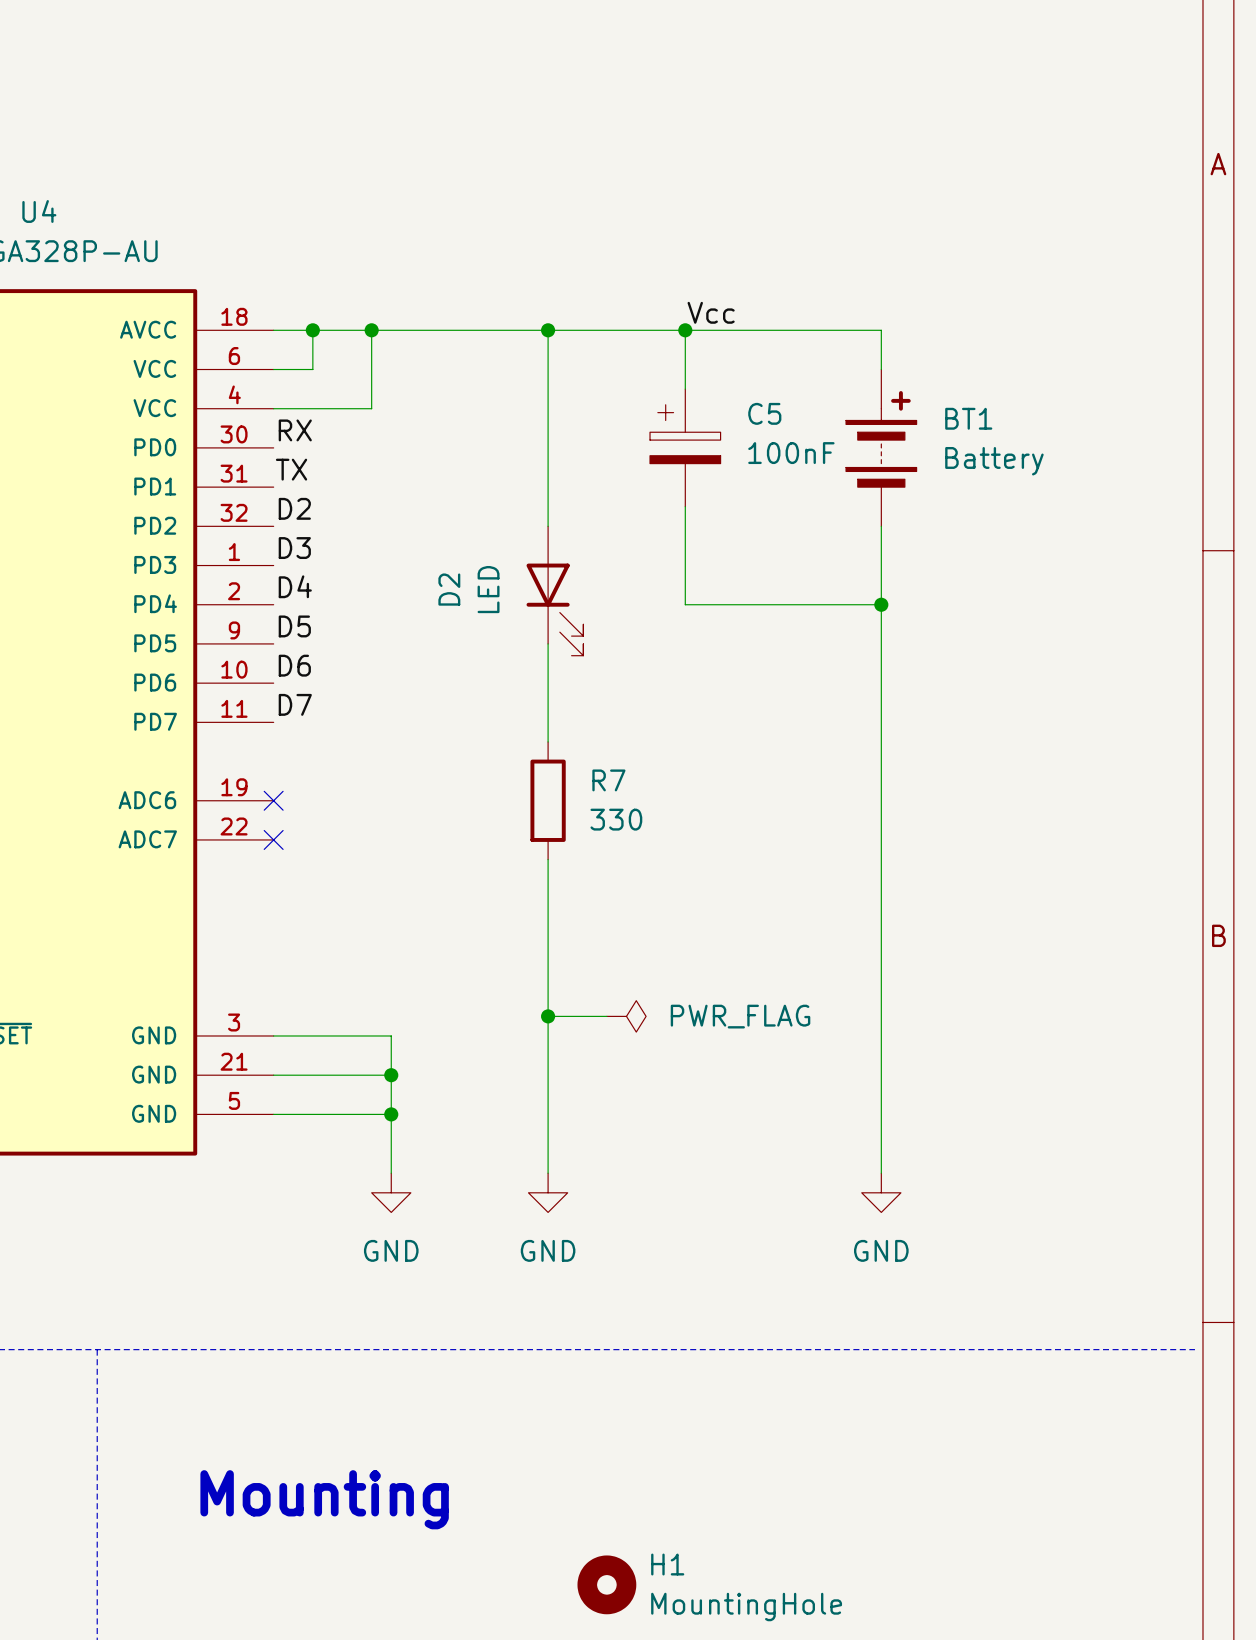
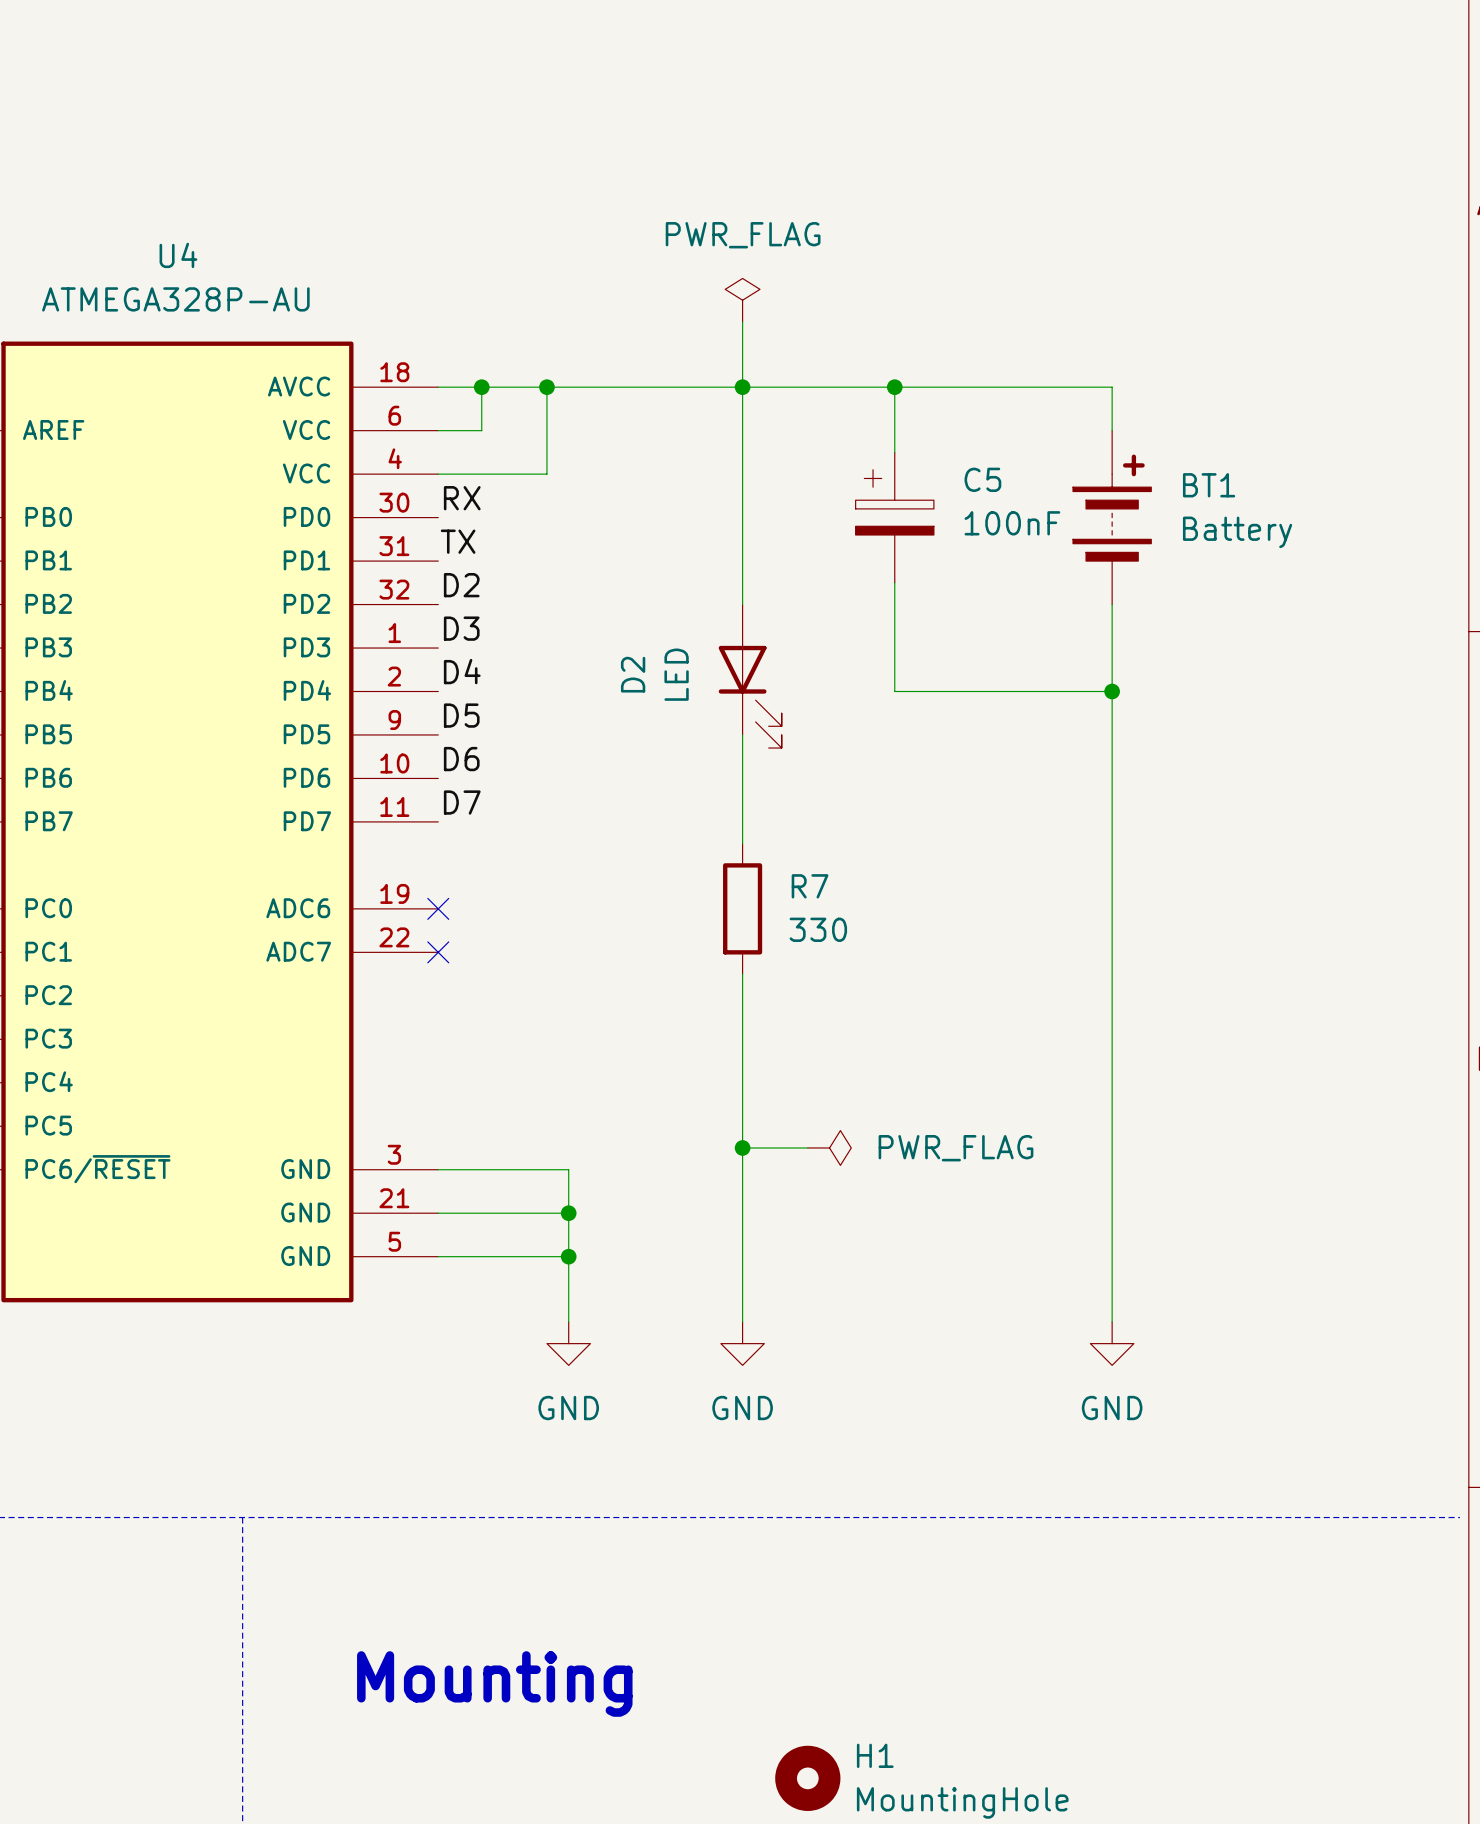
power symbol: none -> PWR_FLAG (742, 300)
wire: none -> (742, 321) (742, 387)
label: Vcc (711, 312) -> none

